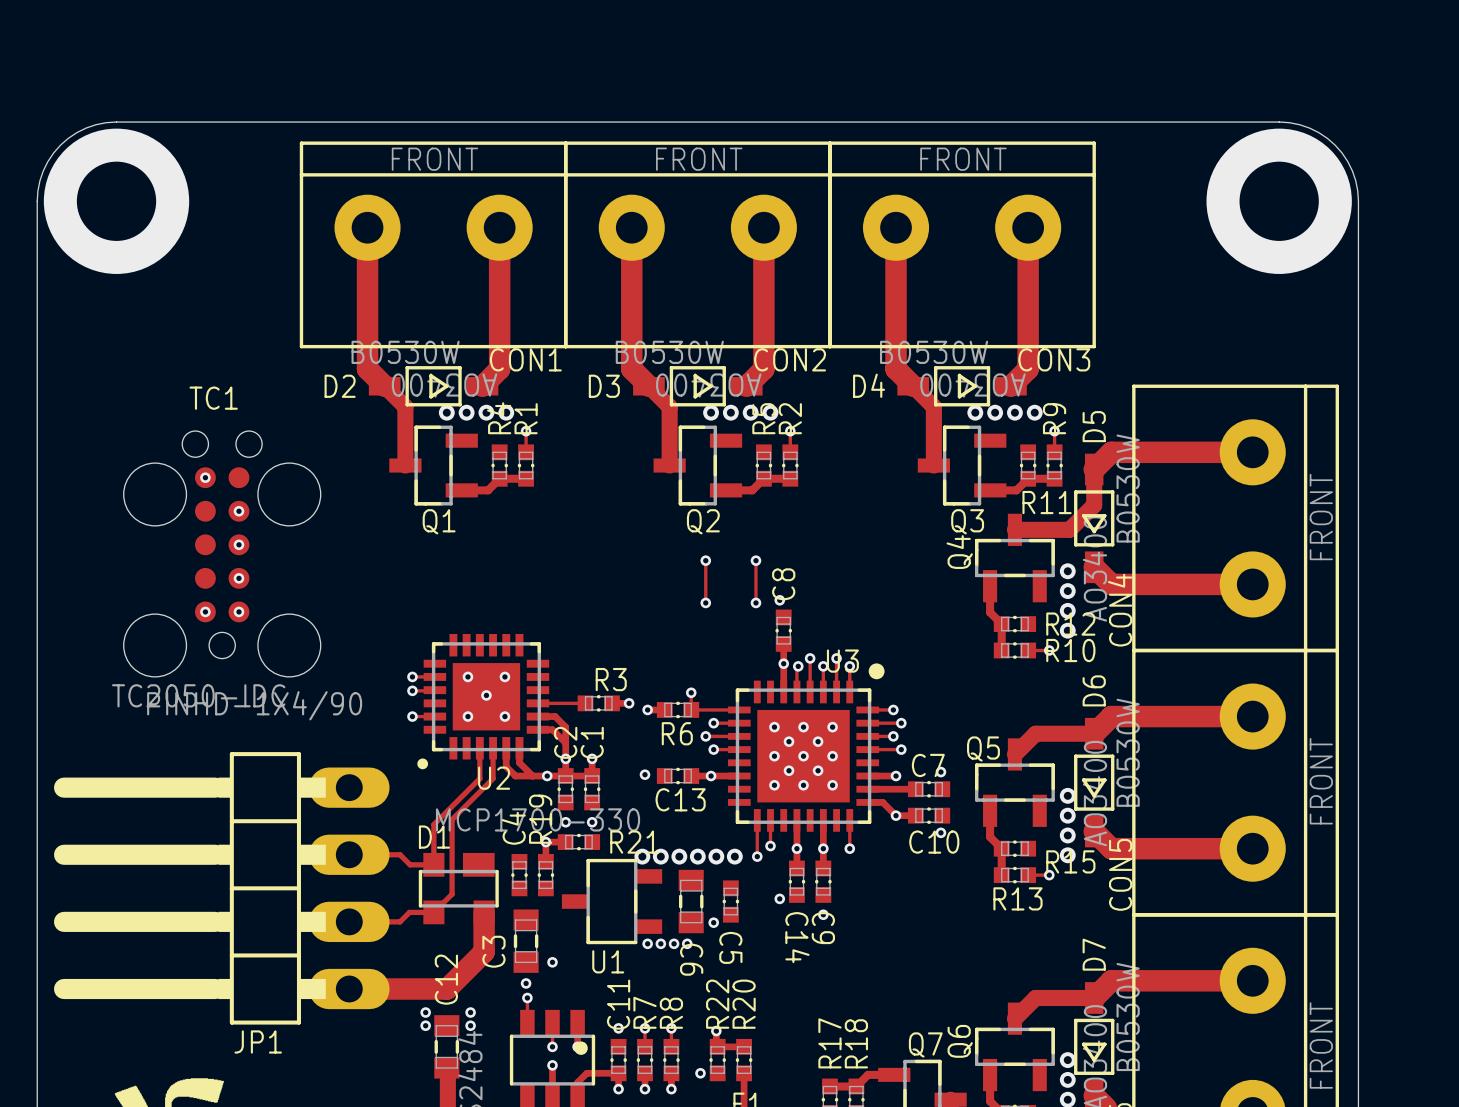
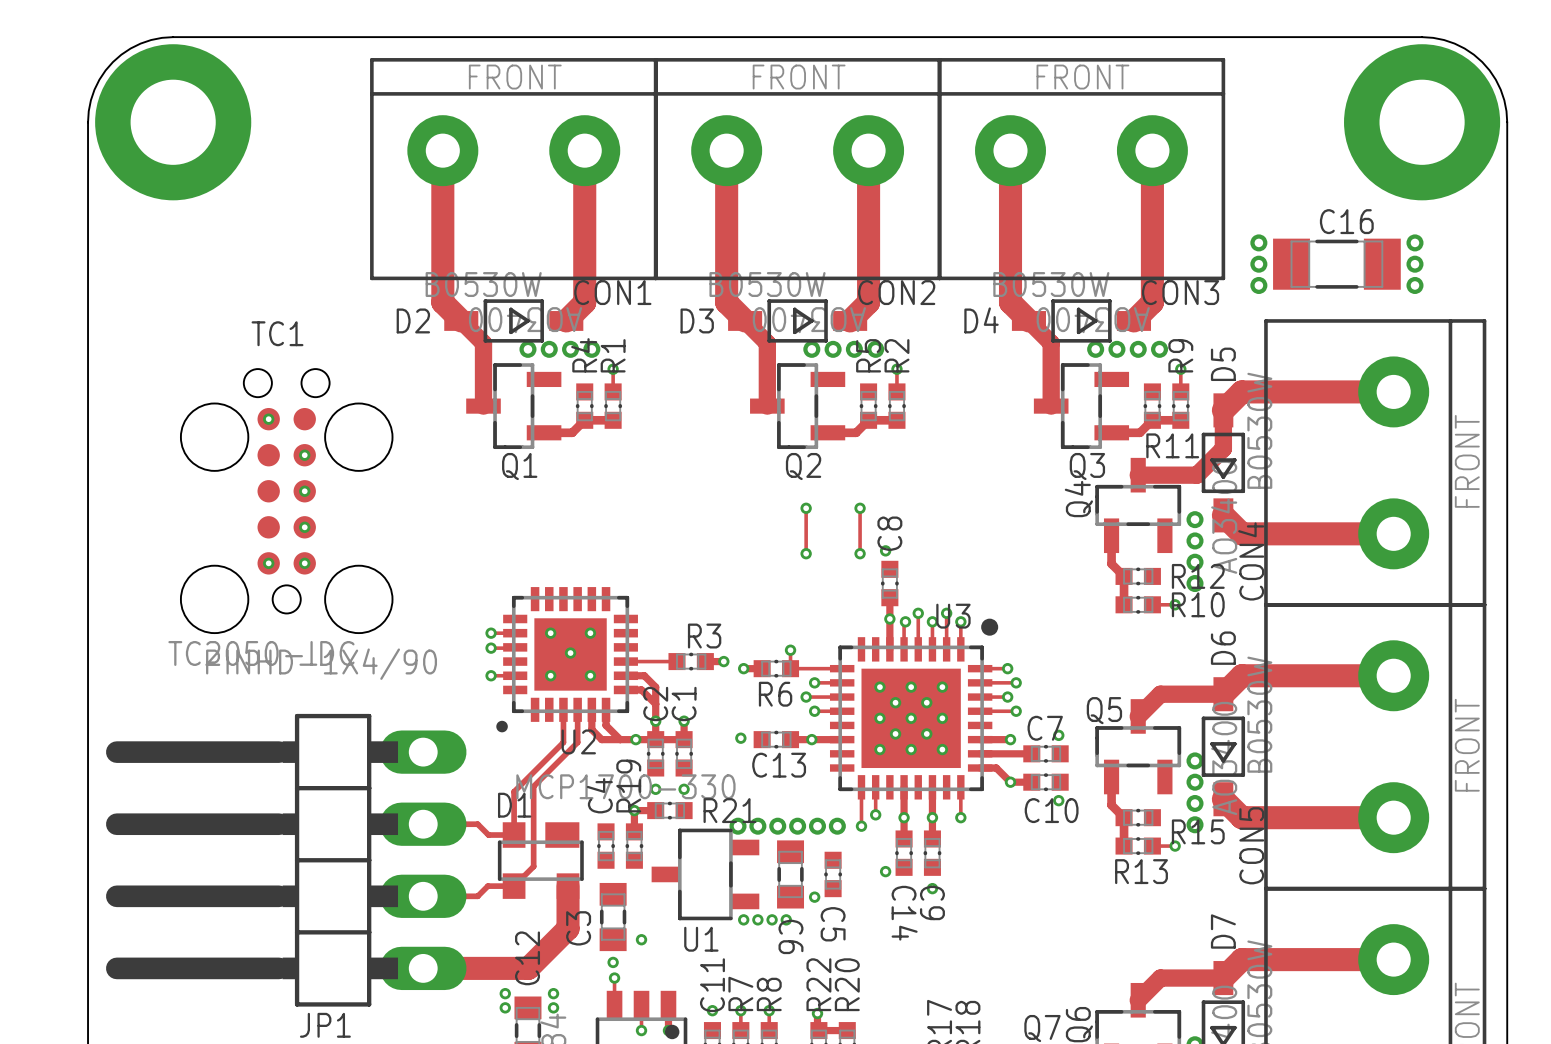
via: none -> (1258, 242)
via: none -> (1414, 242)
via: none -> (1258, 264)
C16: none -> (1336, 264)
via: none -> (1414, 264)
via: none -> (1258, 285)
via: none -> (1414, 285)

